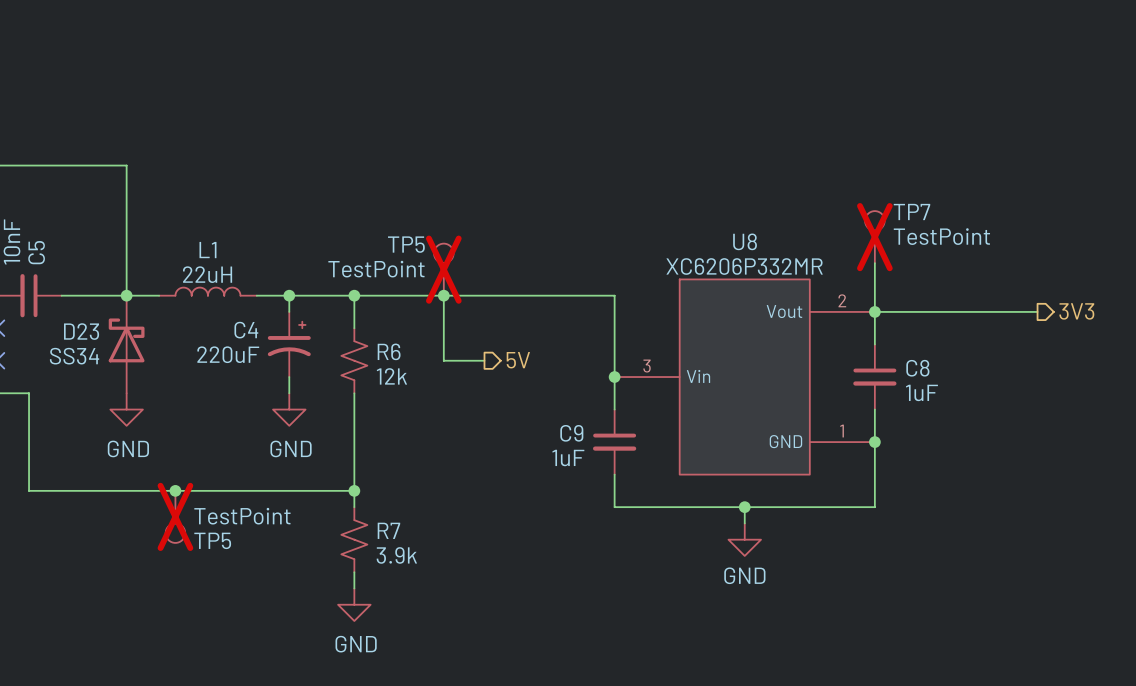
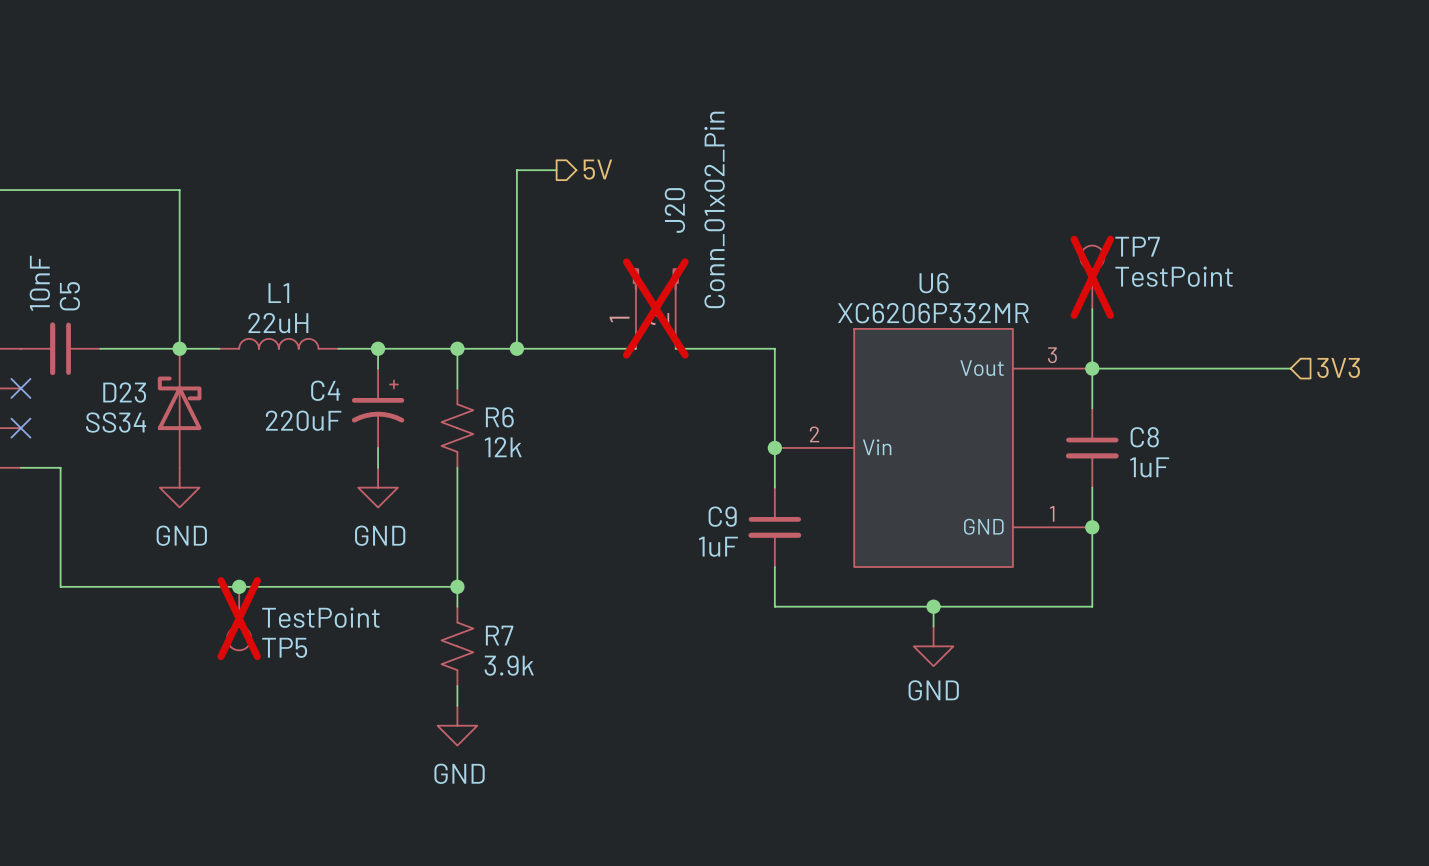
wire: none -> (556, 170) (516, 170) (516, 348)
U8 name: U8 (745, 241) -> U6 (934, 283)
J20: none -> Conn_01x02_Pin (655, 308)
TP5: TestPoint (443, 269) -> none
wire: (443, 295) (443, 360) (484, 360) -> none
junction position: (443, 295) -> (516, 348)
wire: (500, 295) (533, 295) -> none
U8 pin number: 2 (842, 300) -> 3 (1052, 355)
hierarchical label shape: output (1076, 311) -> input (1338, 367)
hierarchical label position: 5V (518, 360) -> 5V (597, 169)
U8 pin number: 3 (647, 366) -> 2 (814, 434)

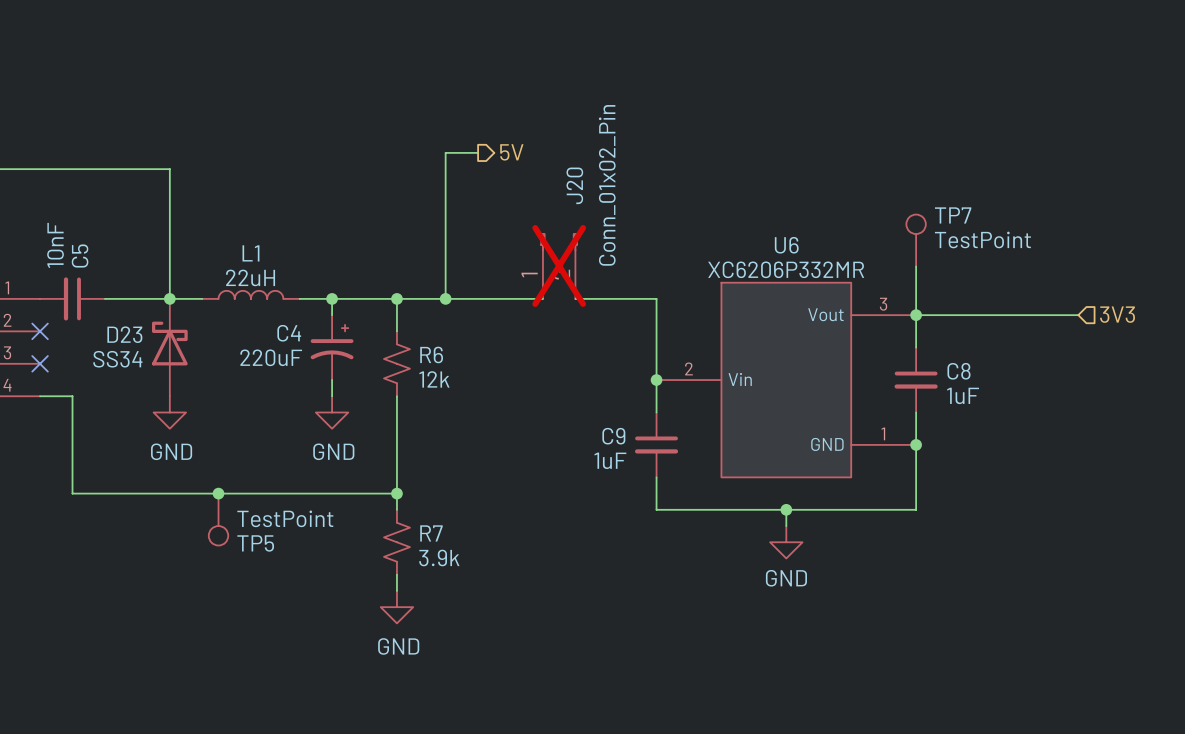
TP7 do-not-place cross: (1092, 277) -> none
TP5 do-not-place cross: (239, 618) -> none

